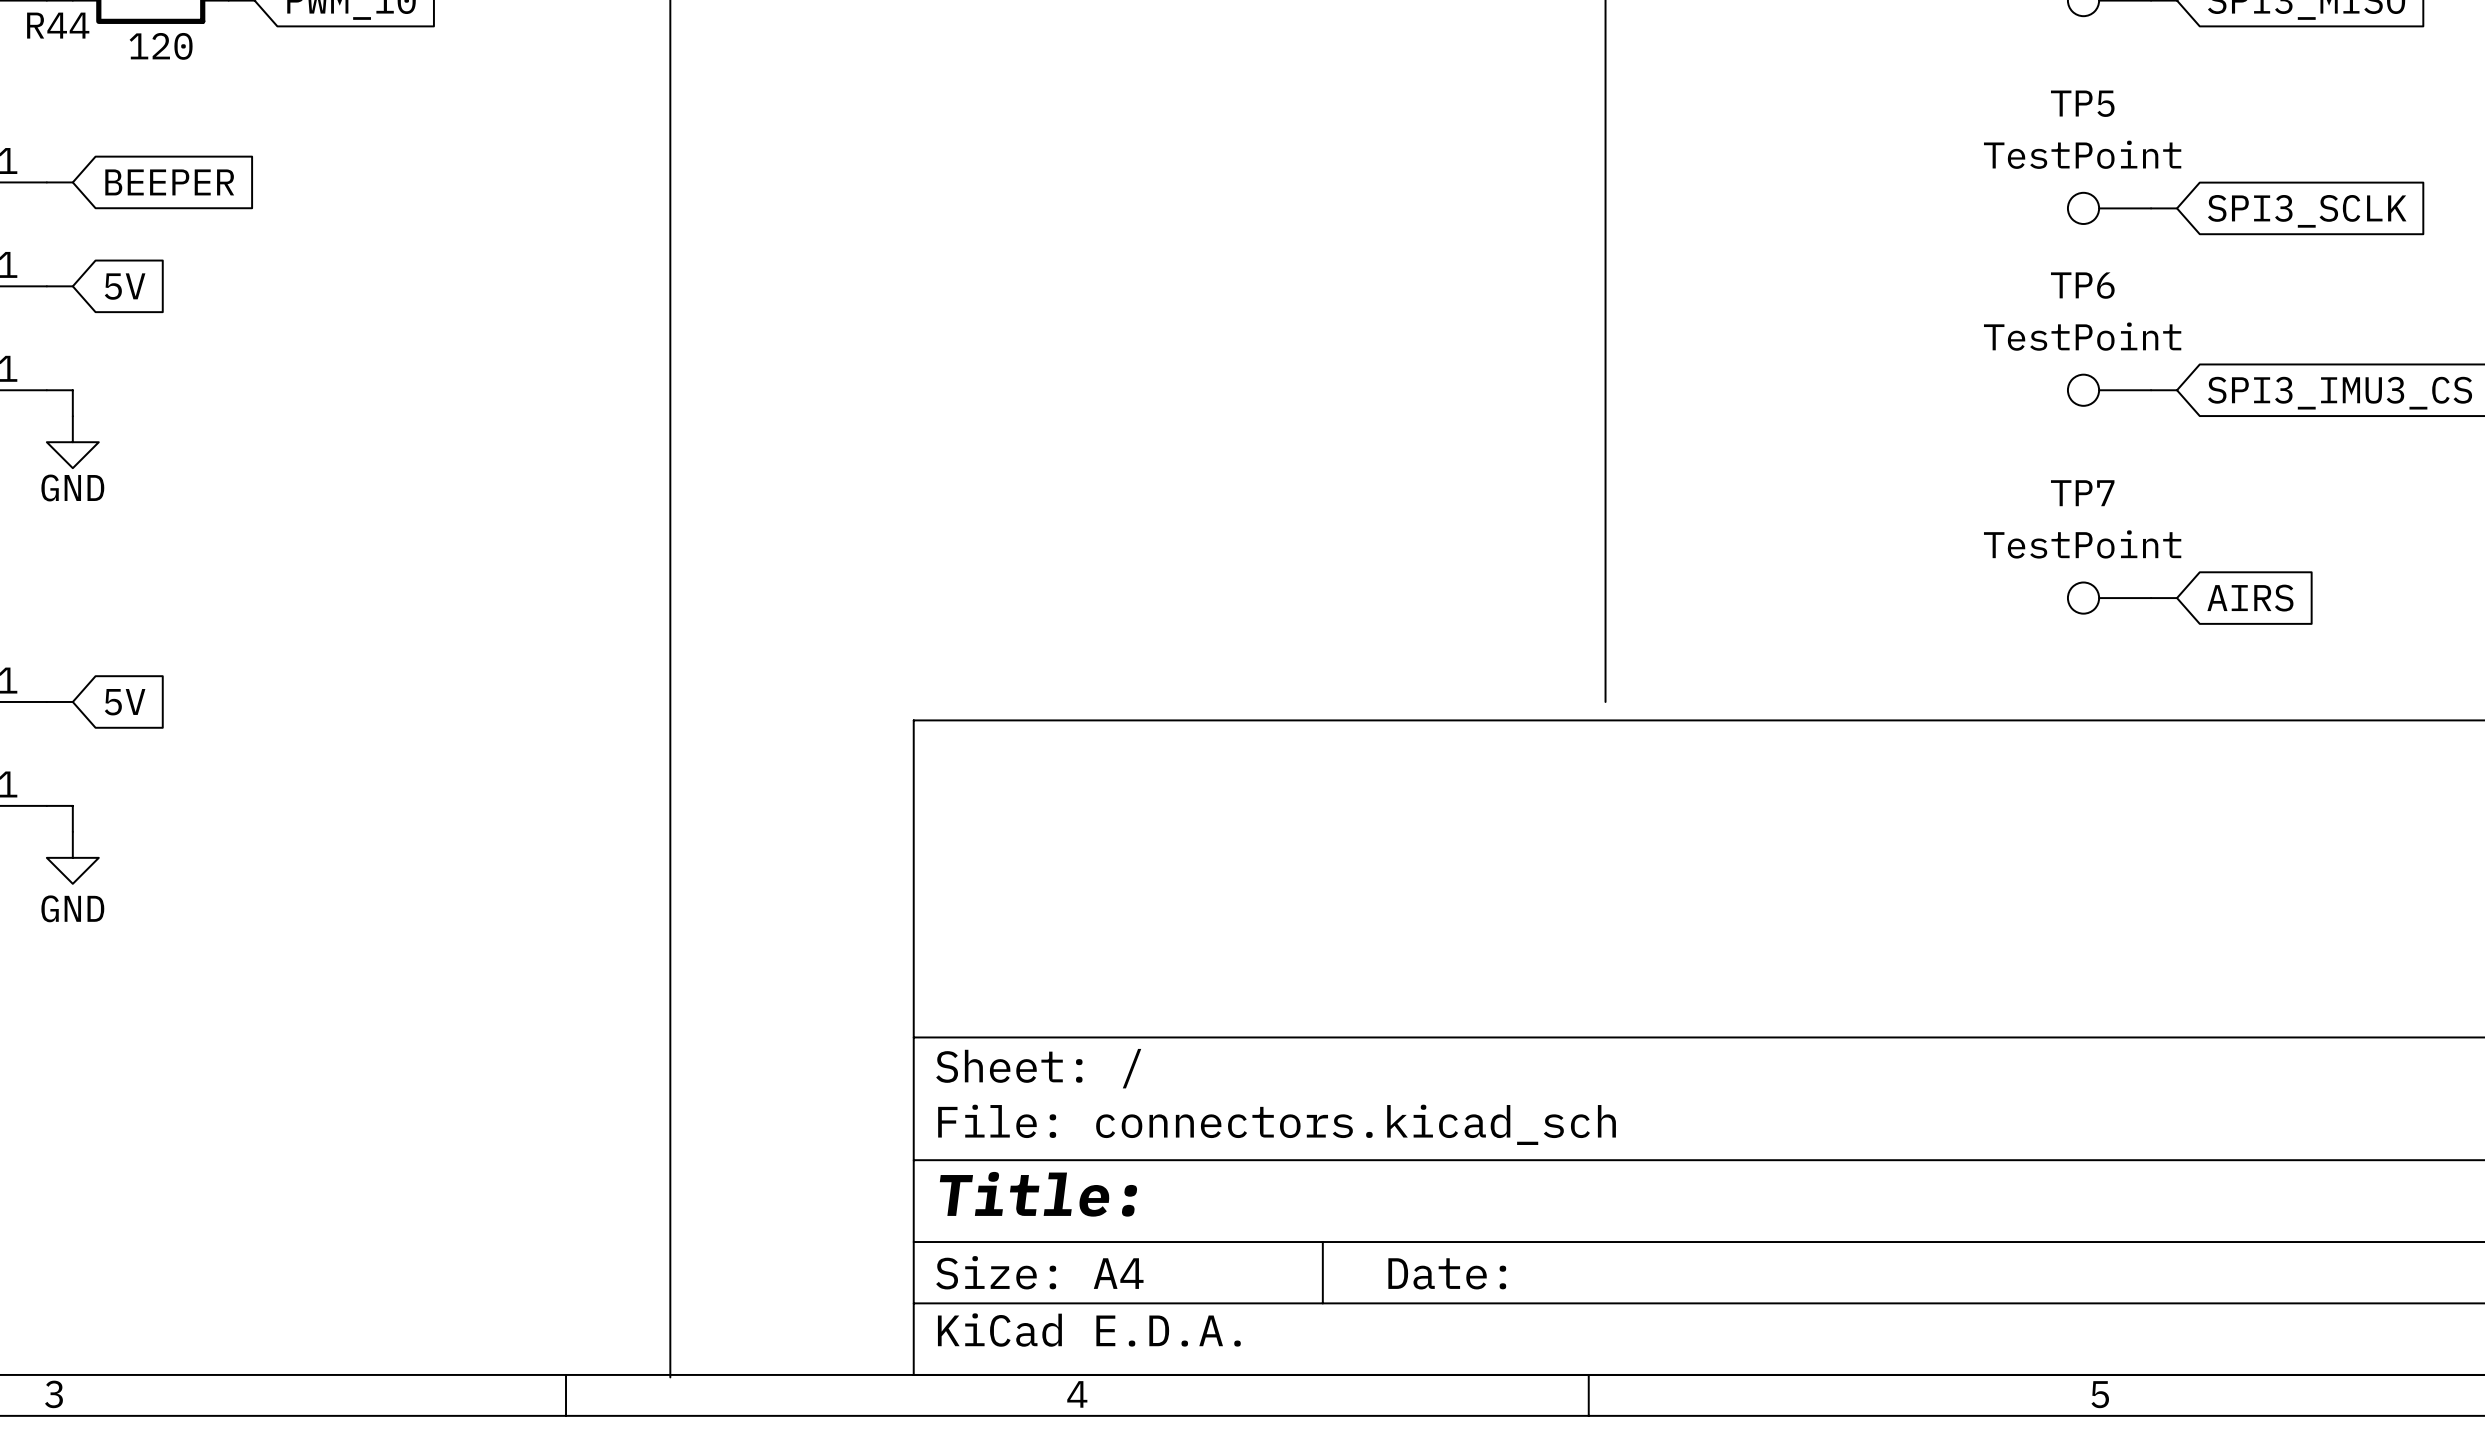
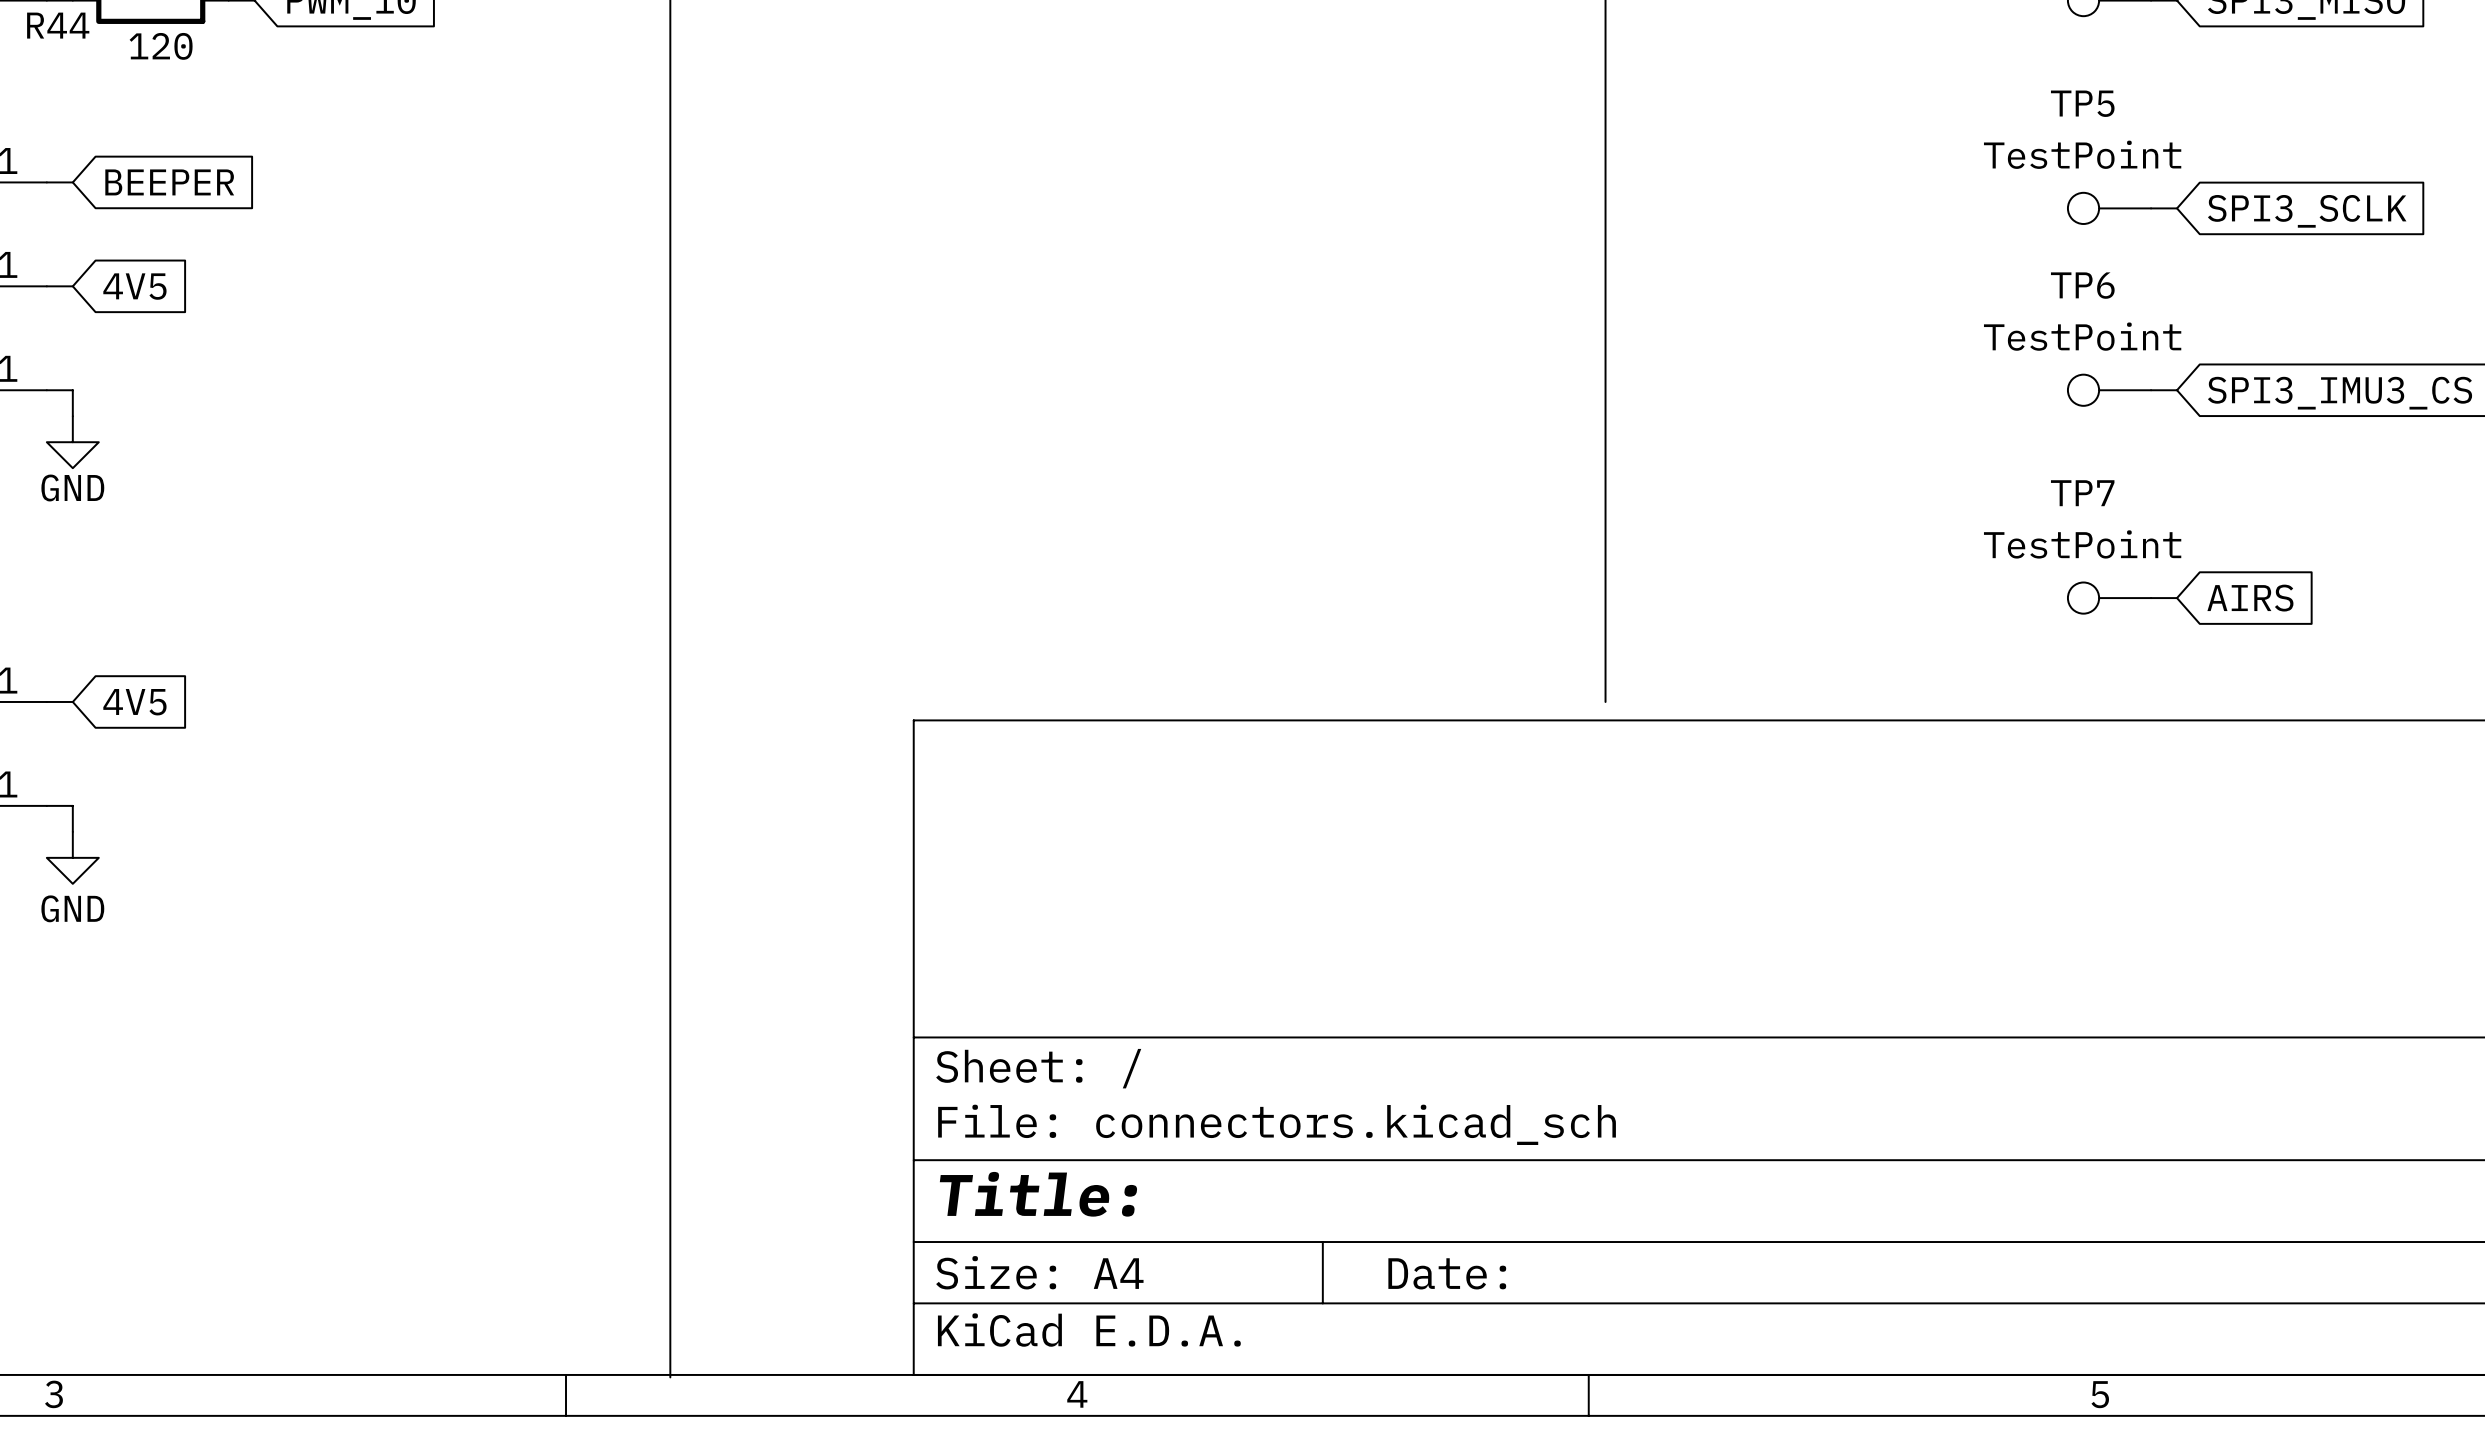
global label: 5V (125, 286) -> 4V5 (134, 286)
global label: 5V (125, 702) -> 4V5 (134, 702)

